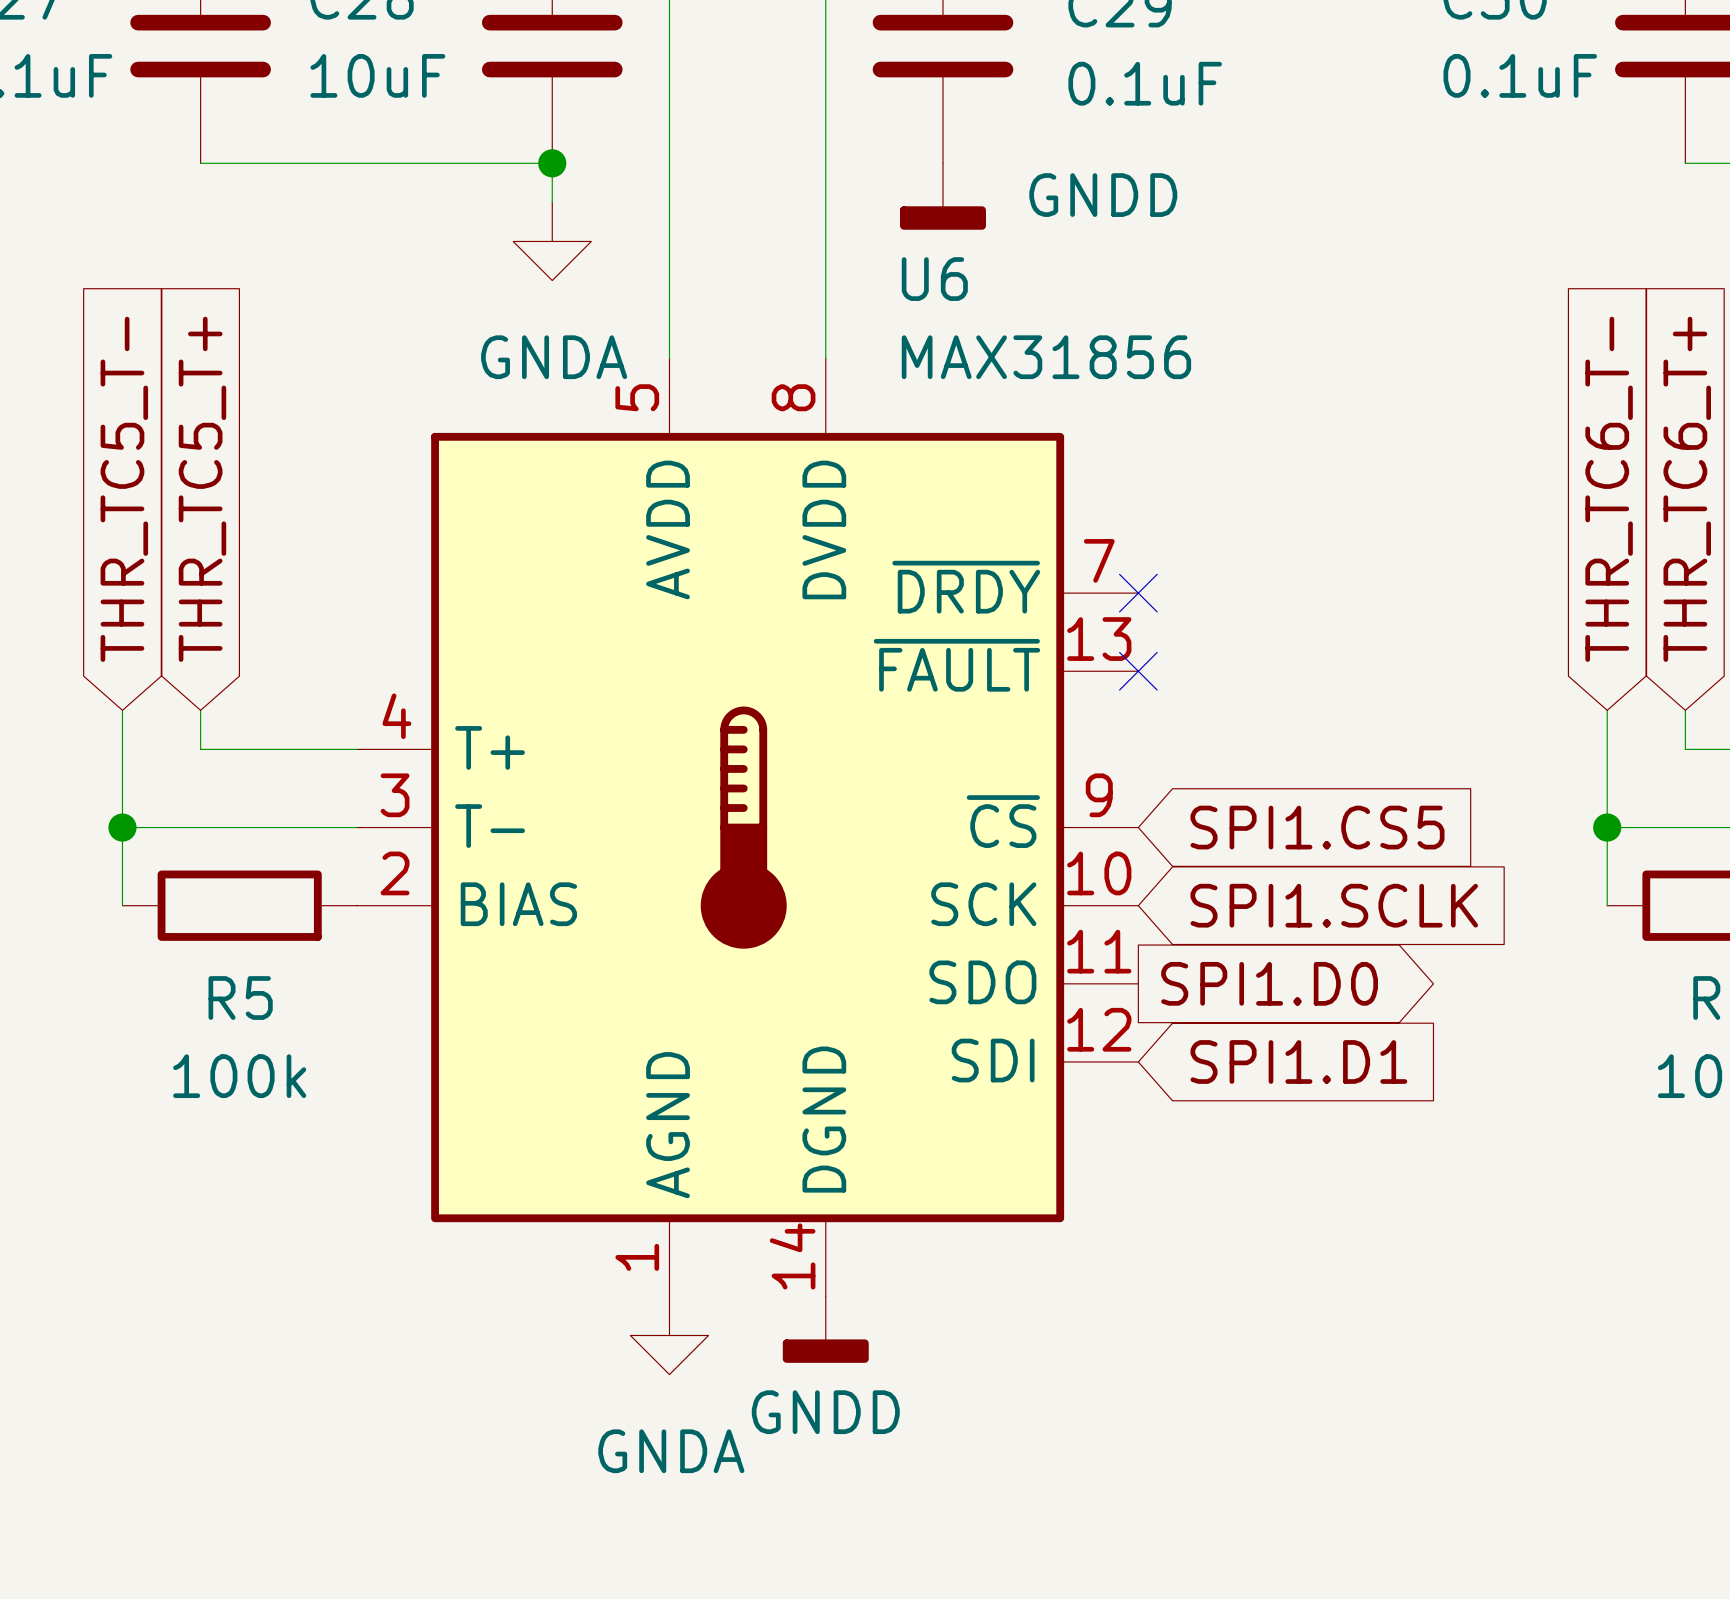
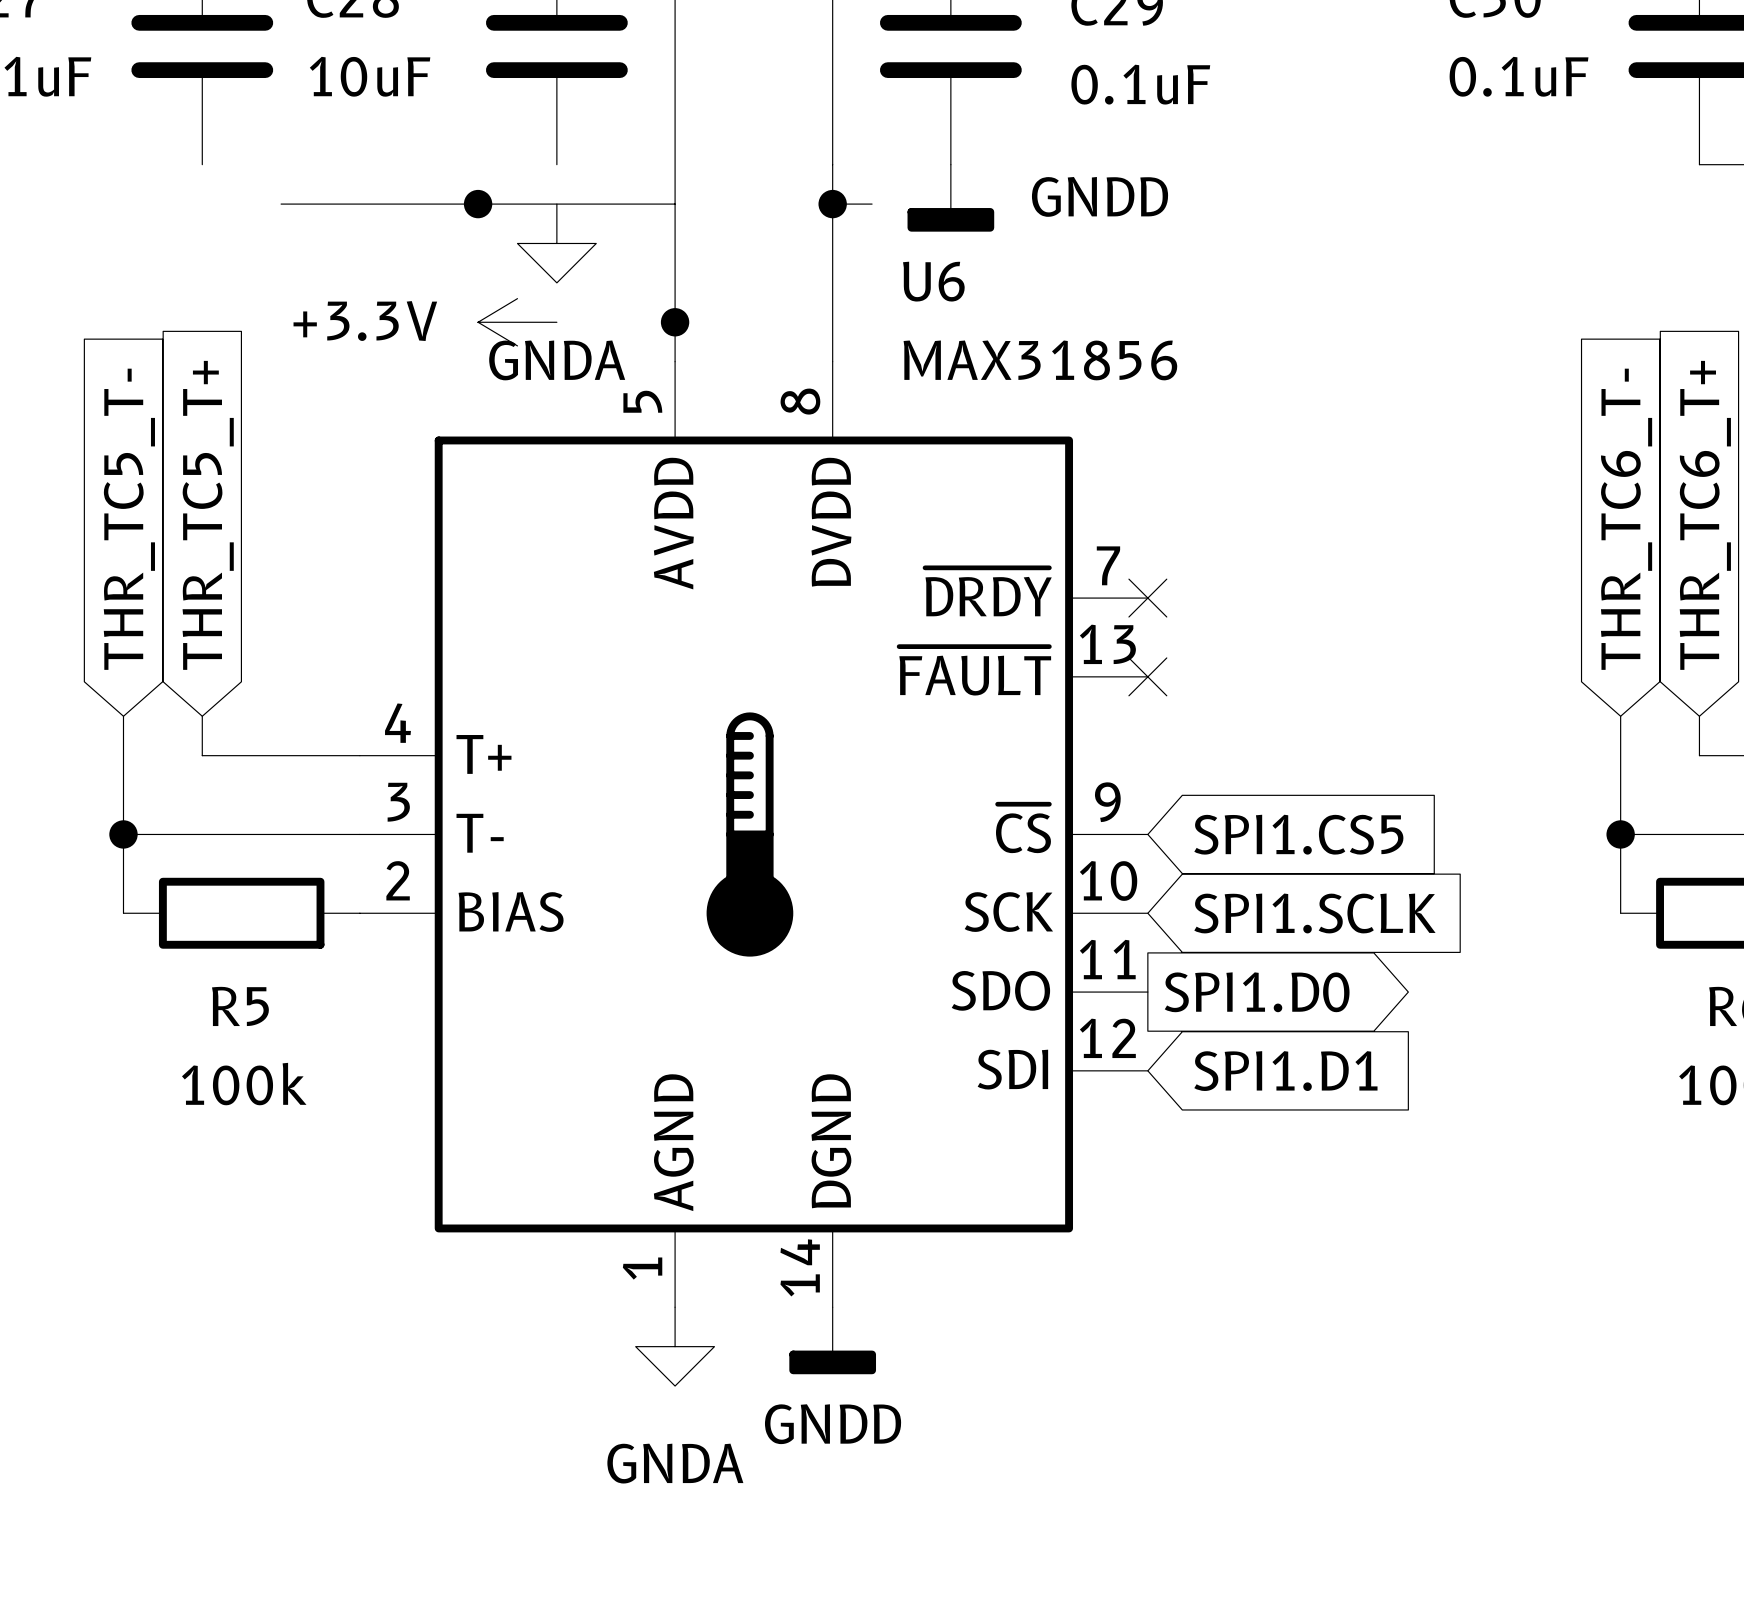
wire: (200, 163) (552, 163) (552, 202) -> none
junction position: (552, 163) -> (478, 204)
wire: none -> (281, 204) (675, 204)
wire: none -> (832, 204) (872, 204)
junction: none -> (832, 204)
power symbol: none -> +3.3V (517, 322)
junction: none -> (675, 322)

